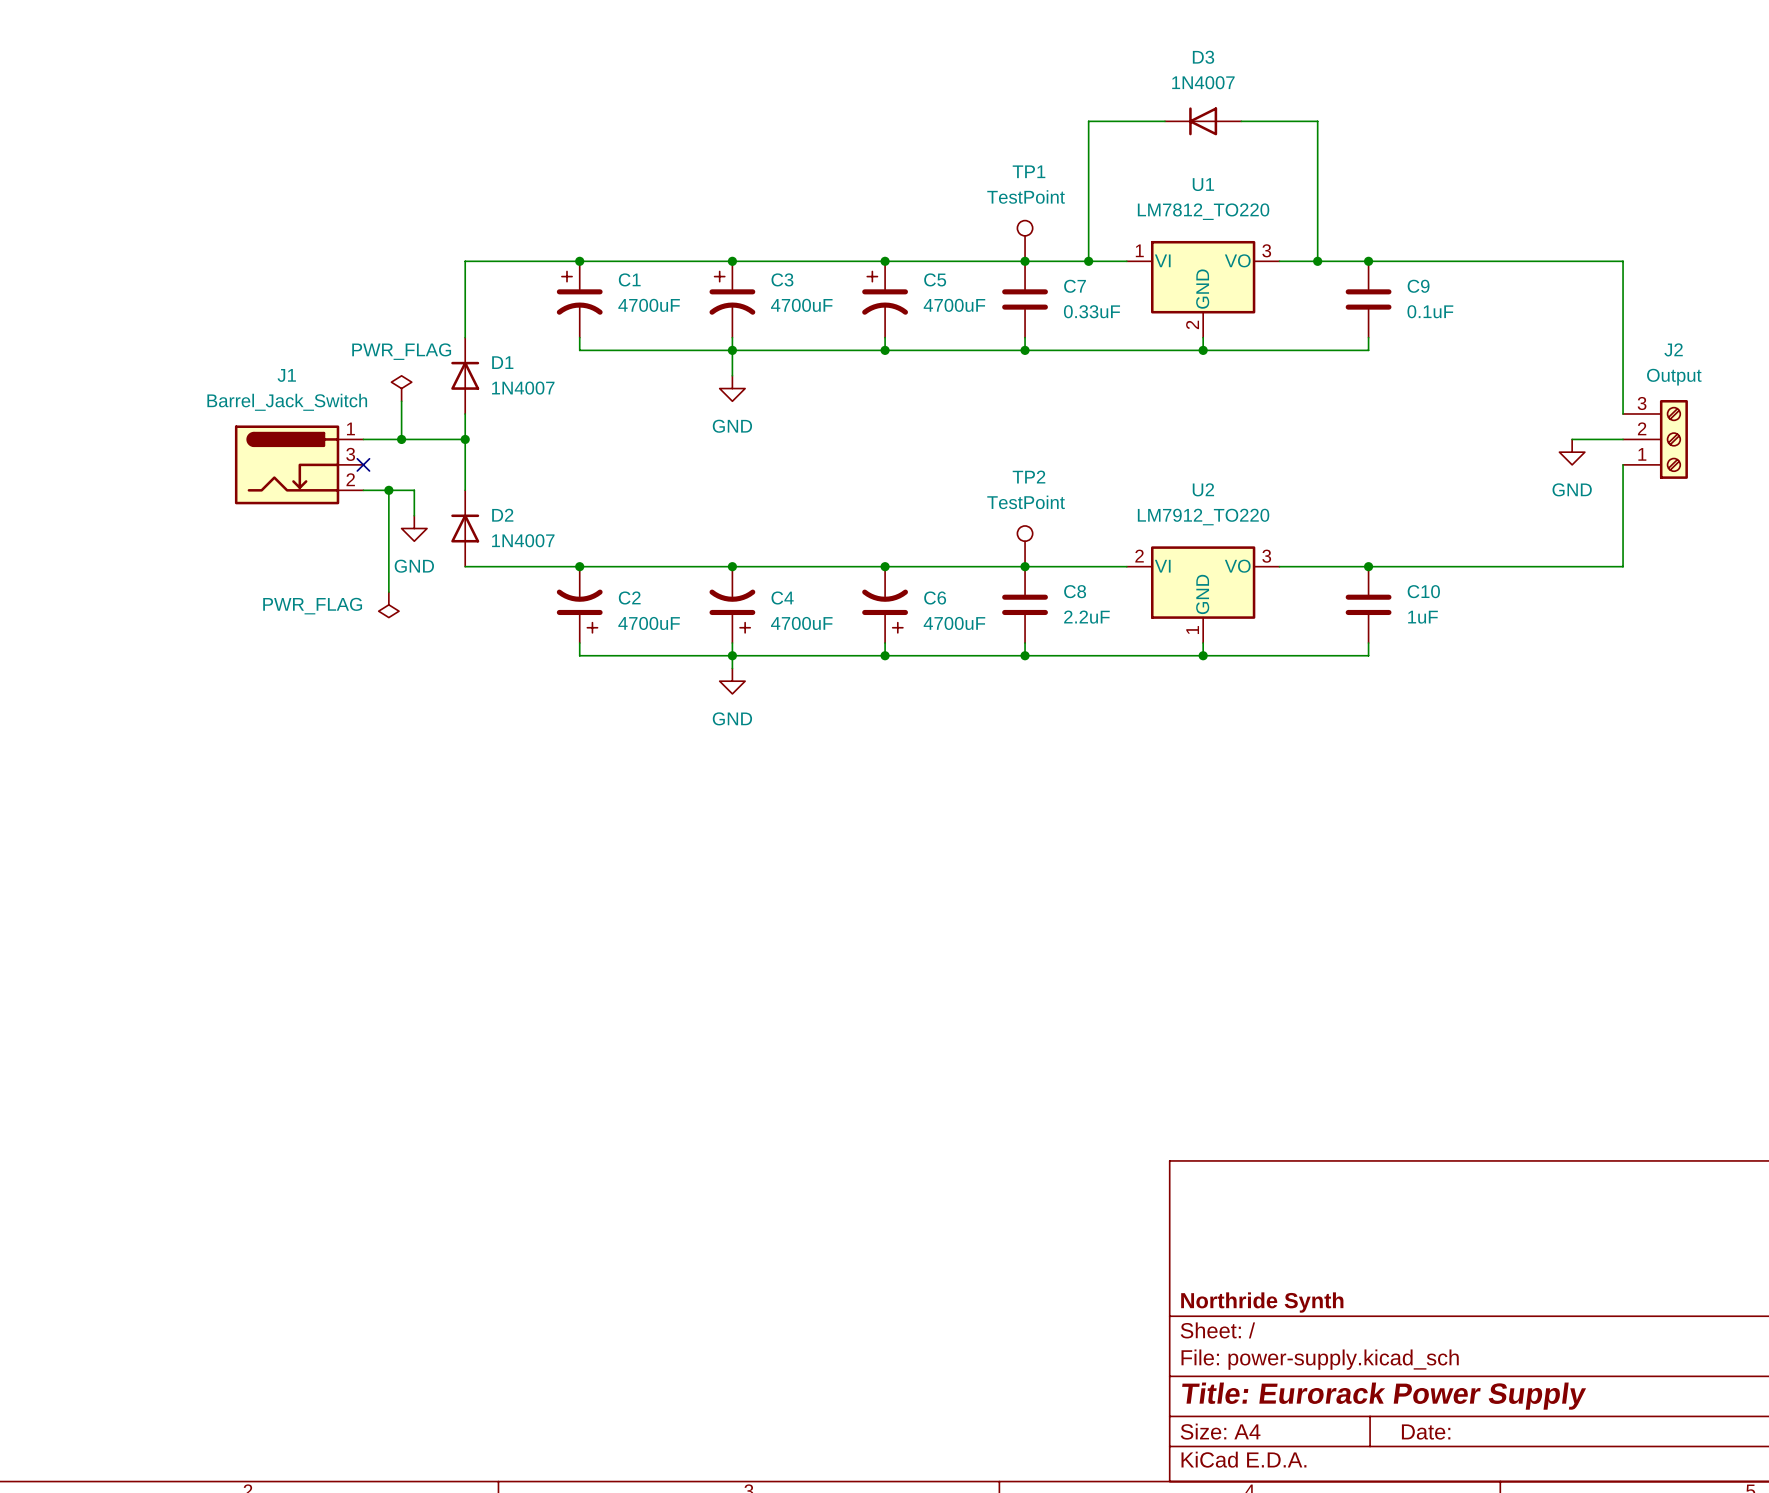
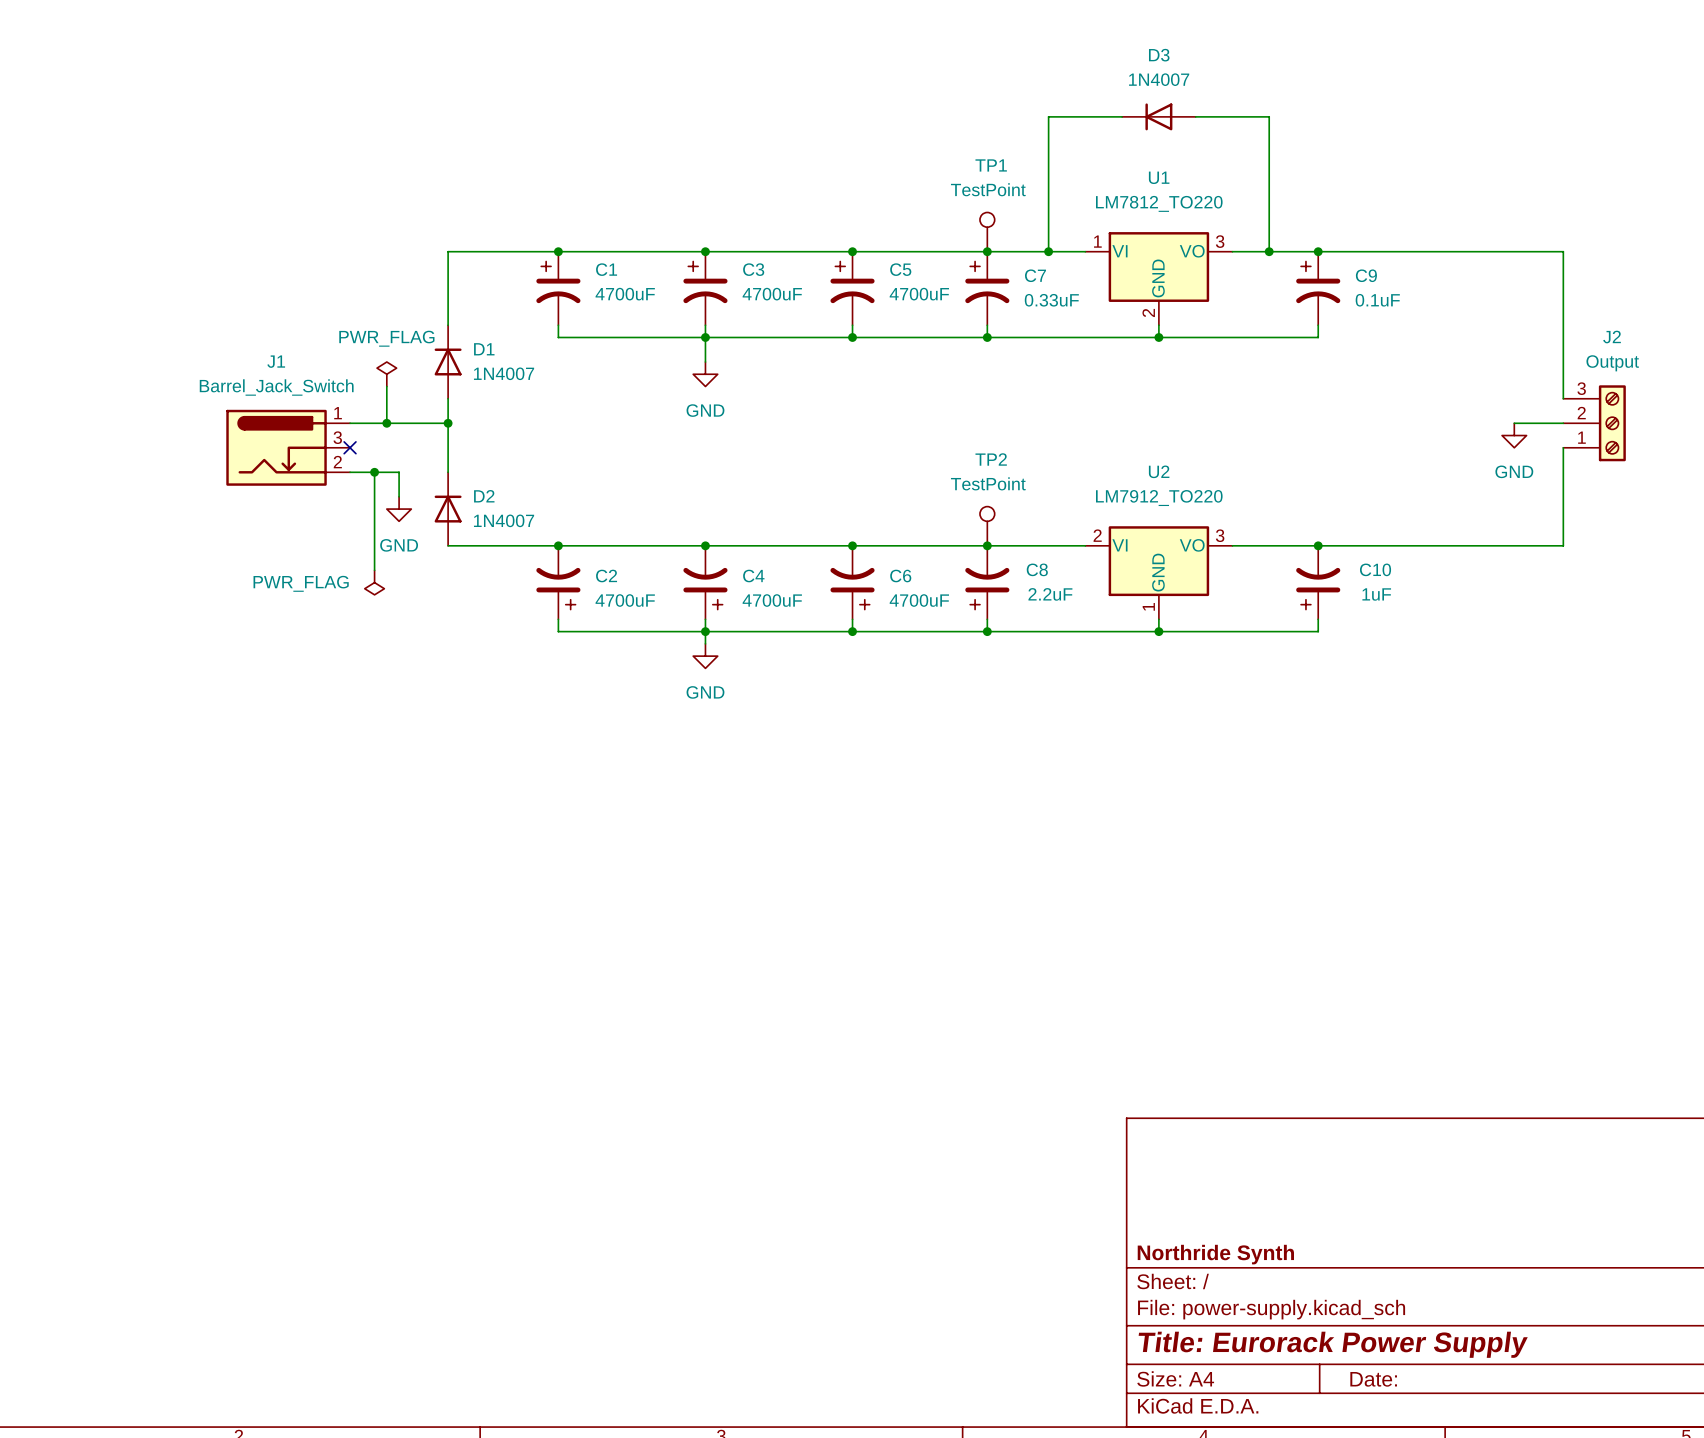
C7 symbol: [1002, 261, 1048, 338] -> [965, 251, 1010, 326]
C9 symbol: [1345, 261, 1392, 338] -> [1296, 251, 1341, 326]
C8 symbol: [1002, 566, 1048, 644] -> [965, 545, 1010, 620]
C10 symbol: [1345, 566, 1392, 644] -> [1296, 545, 1341, 620]

